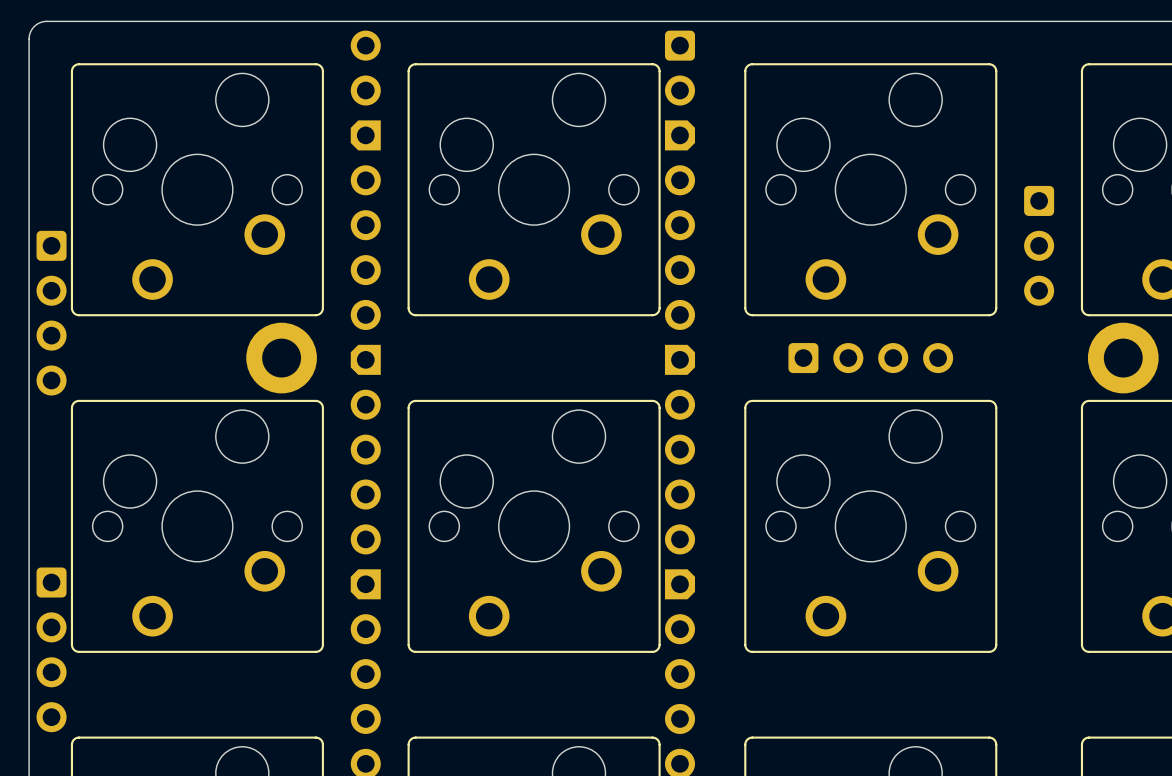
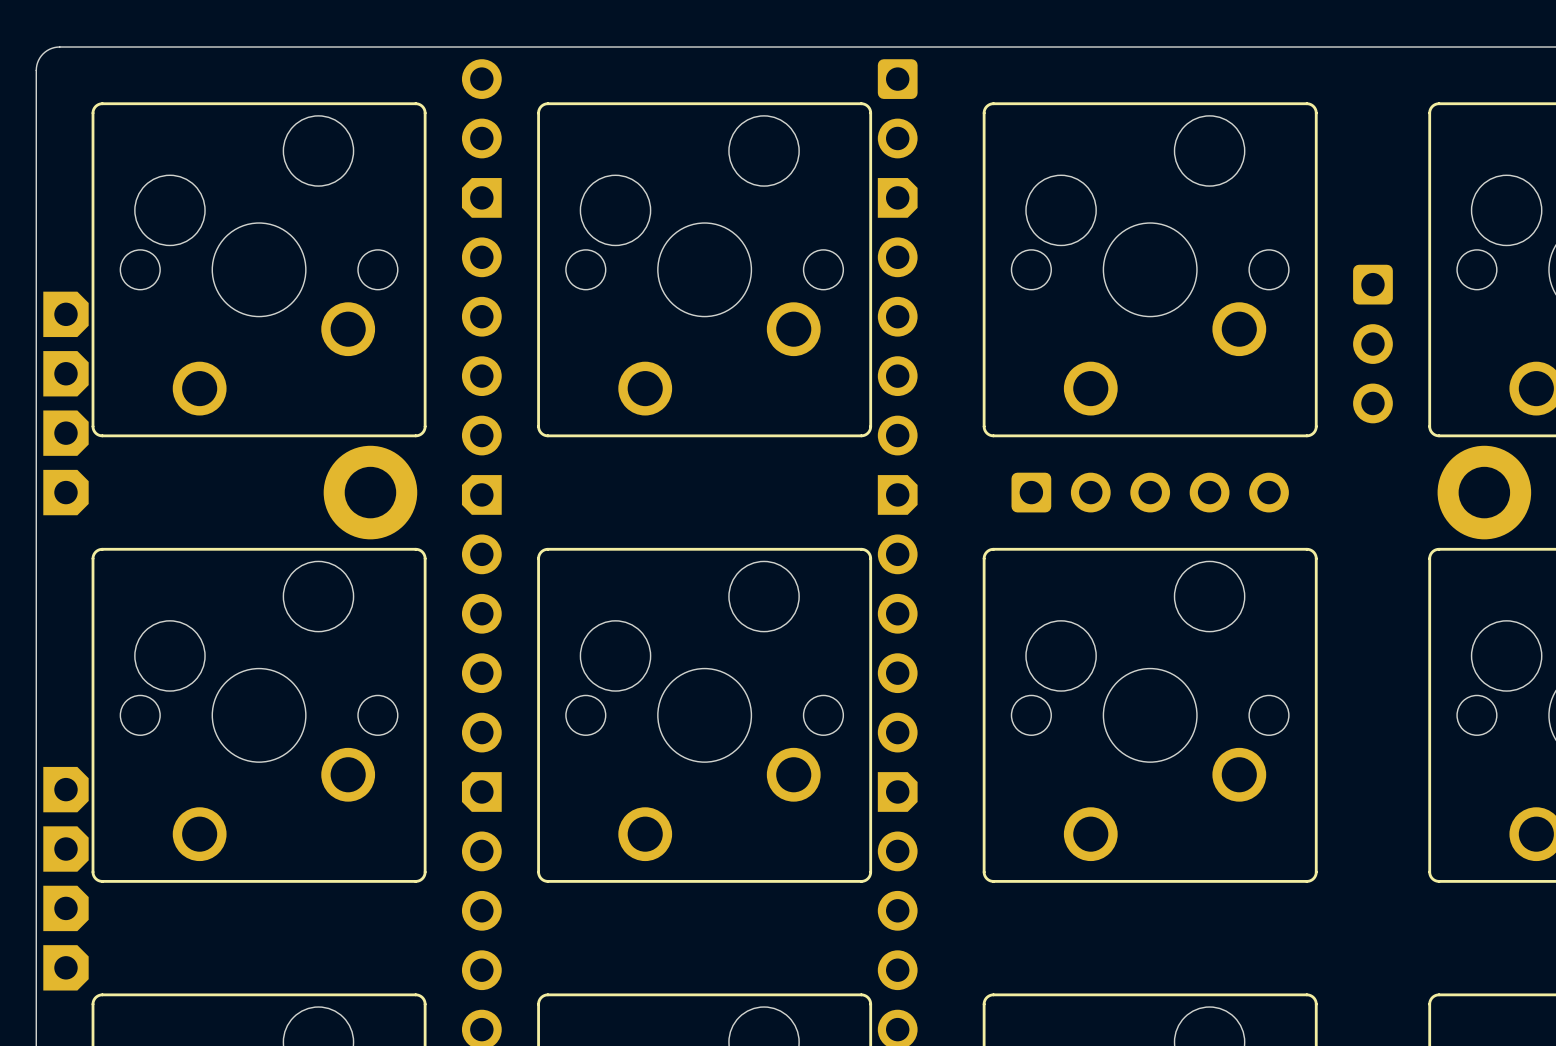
part: none -> (65, 403)
part: (51, 313) -> none
part footprint: [788, 343, 954, 374] -> [1011, 472, 1289, 513]
part footprint: [36, 567, 67, 733] -> [43, 766, 89, 991]

